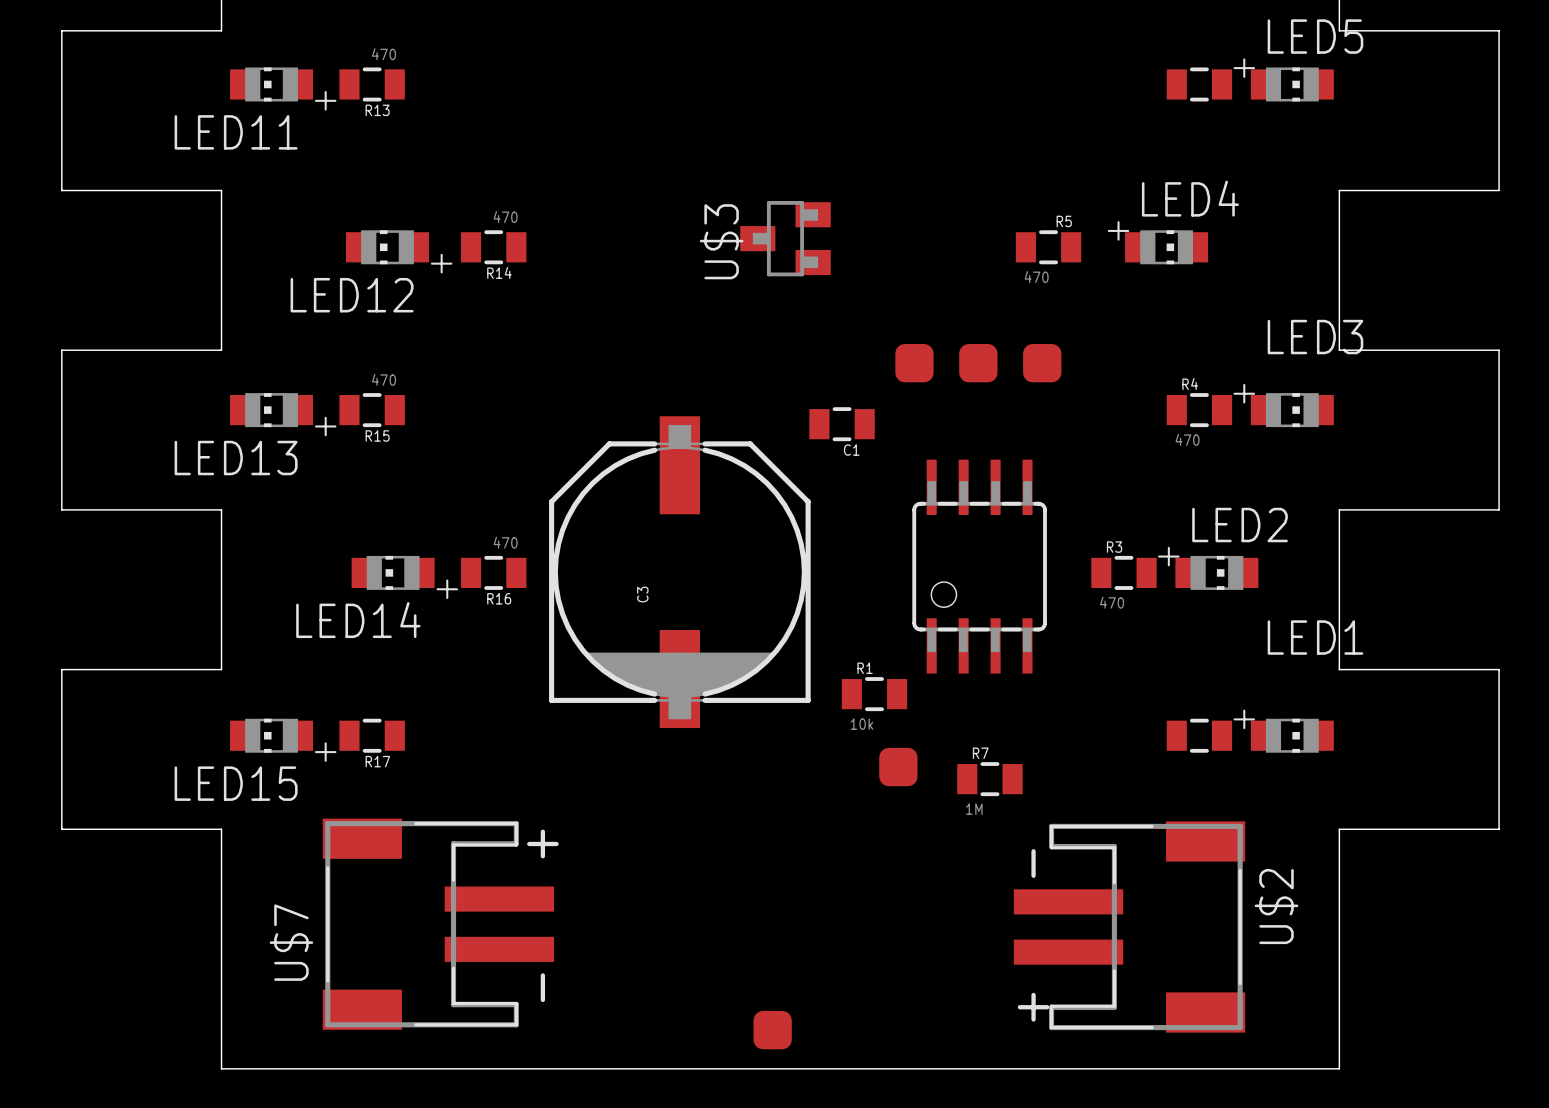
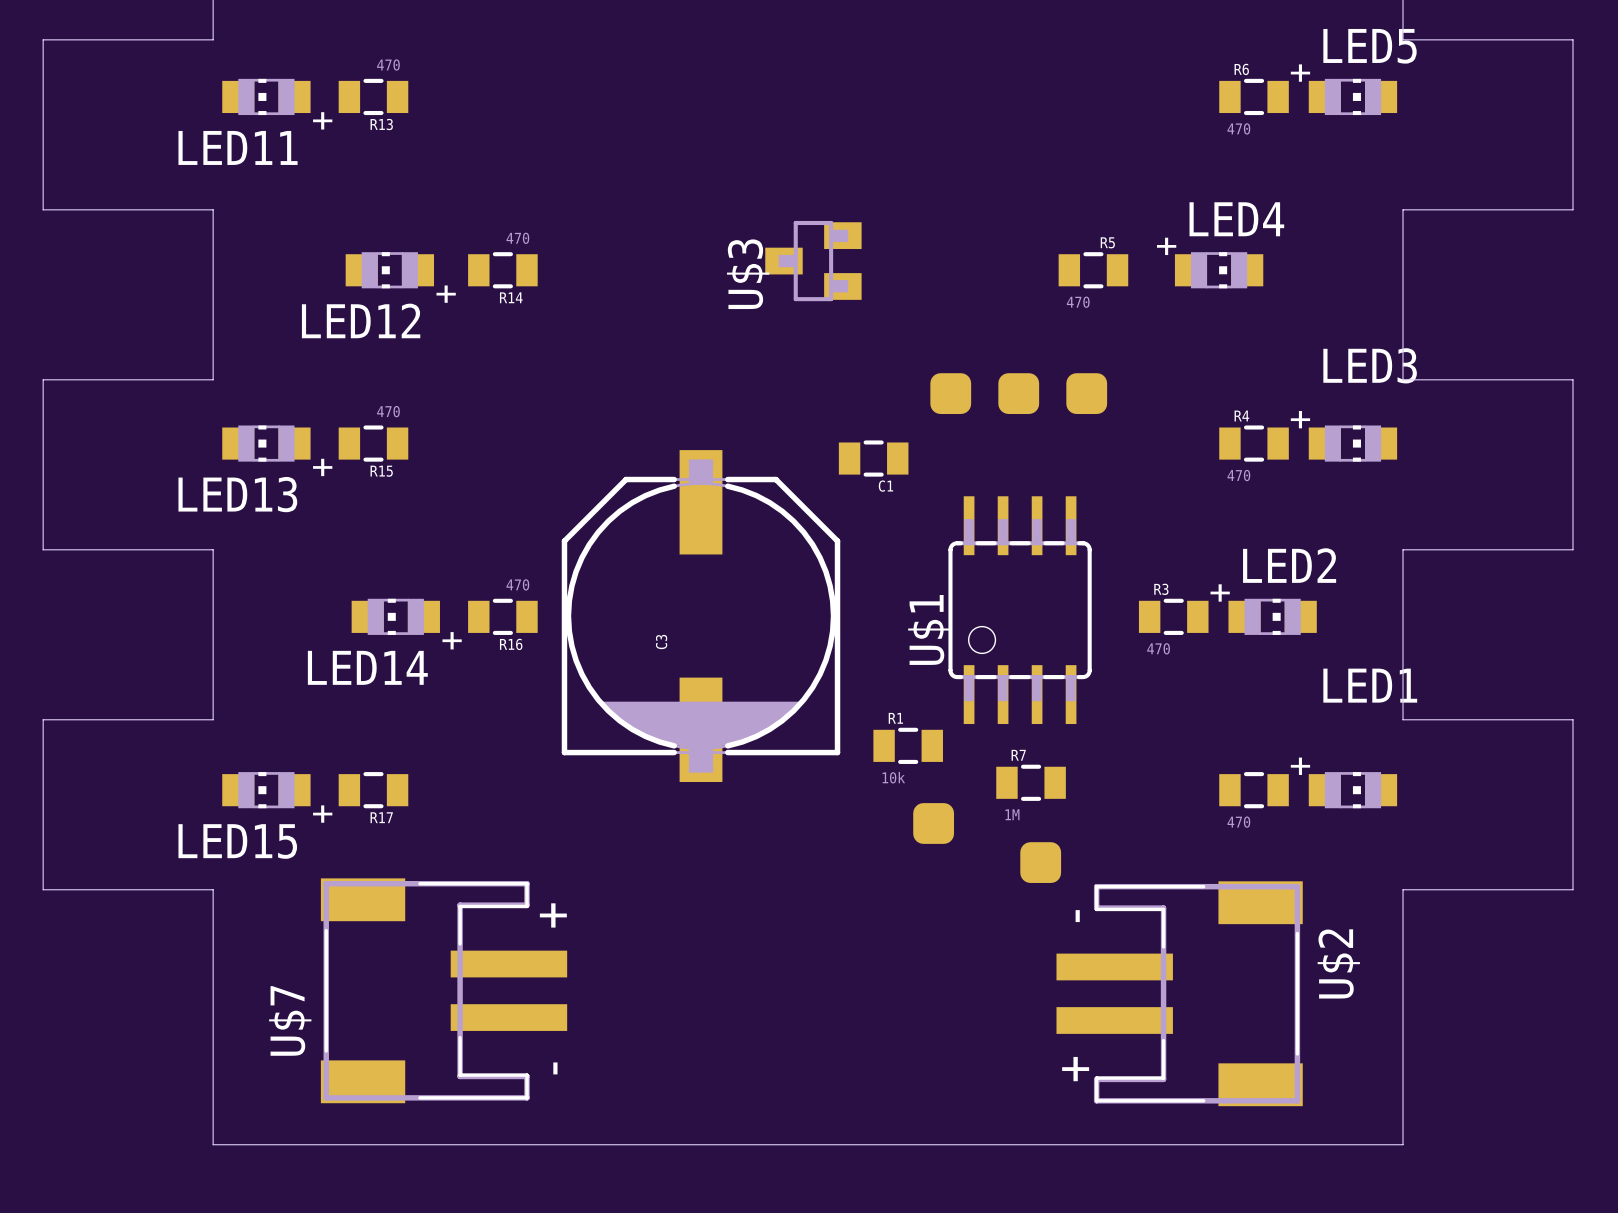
R6 name: none -> R6 (1241, 69)
R6 value: none -> 470 (1238, 128)
U$1 name: none -> U$1 (929, 629)
part value: none -> 470 (1238, 822)
R7 position: (989, 779) -> (1031, 782)
part position: (772, 1030) -> (1040, 862)

